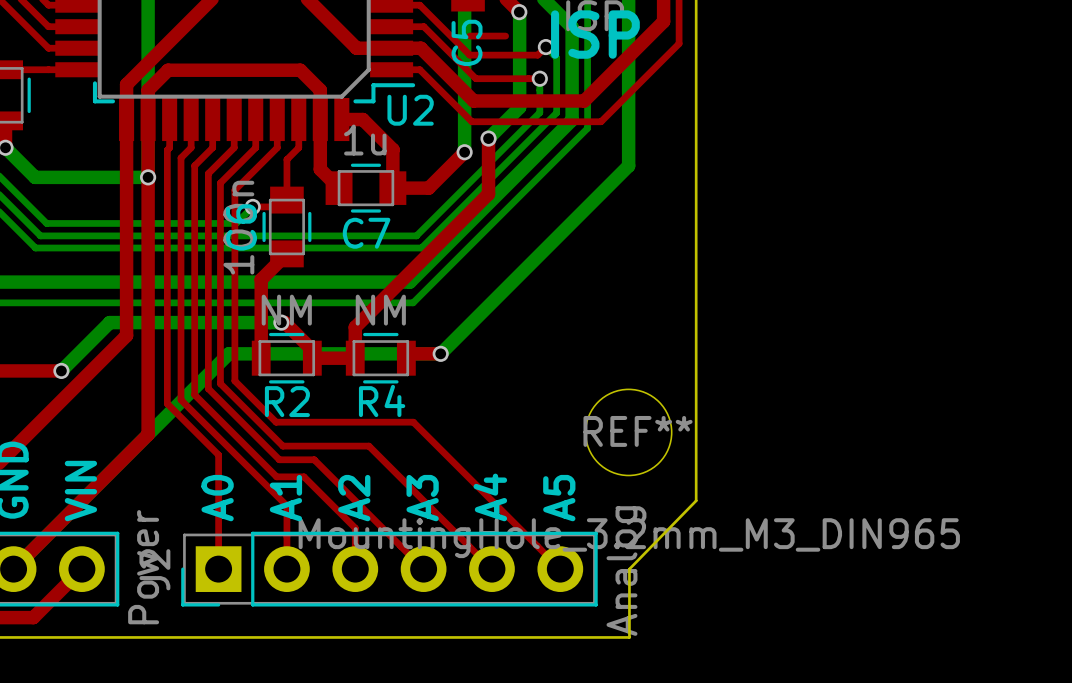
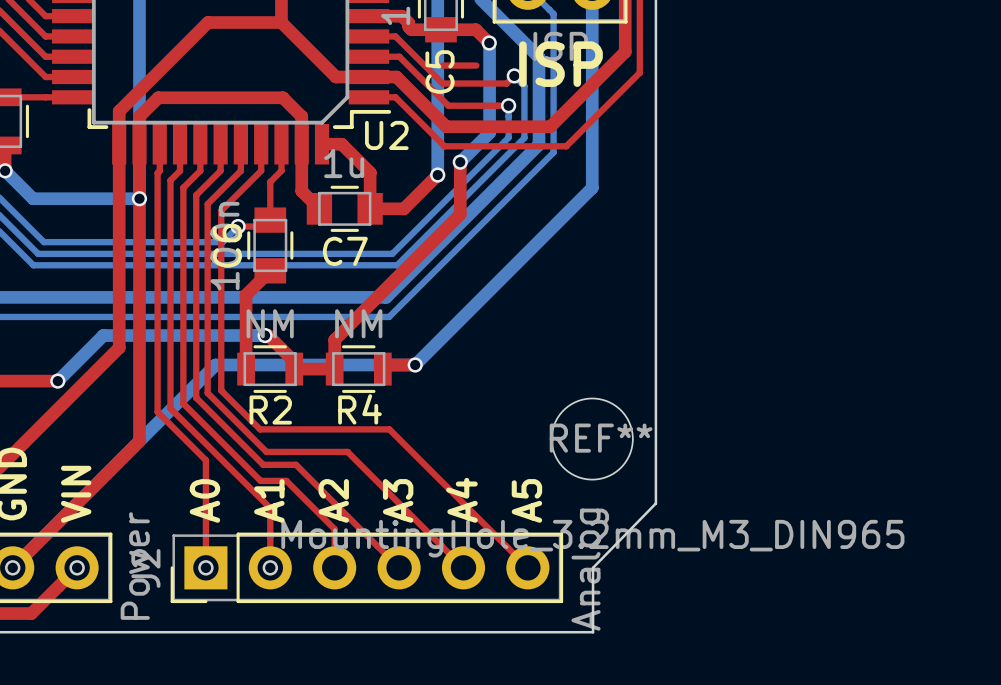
round board edge: none -> [5, 560, 21, 576]
round board edge: none -> [69, 560, 85, 576]
round board edge: none -> [198, 560, 214, 576]
round board edge: none -> [262, 560, 279, 576]

